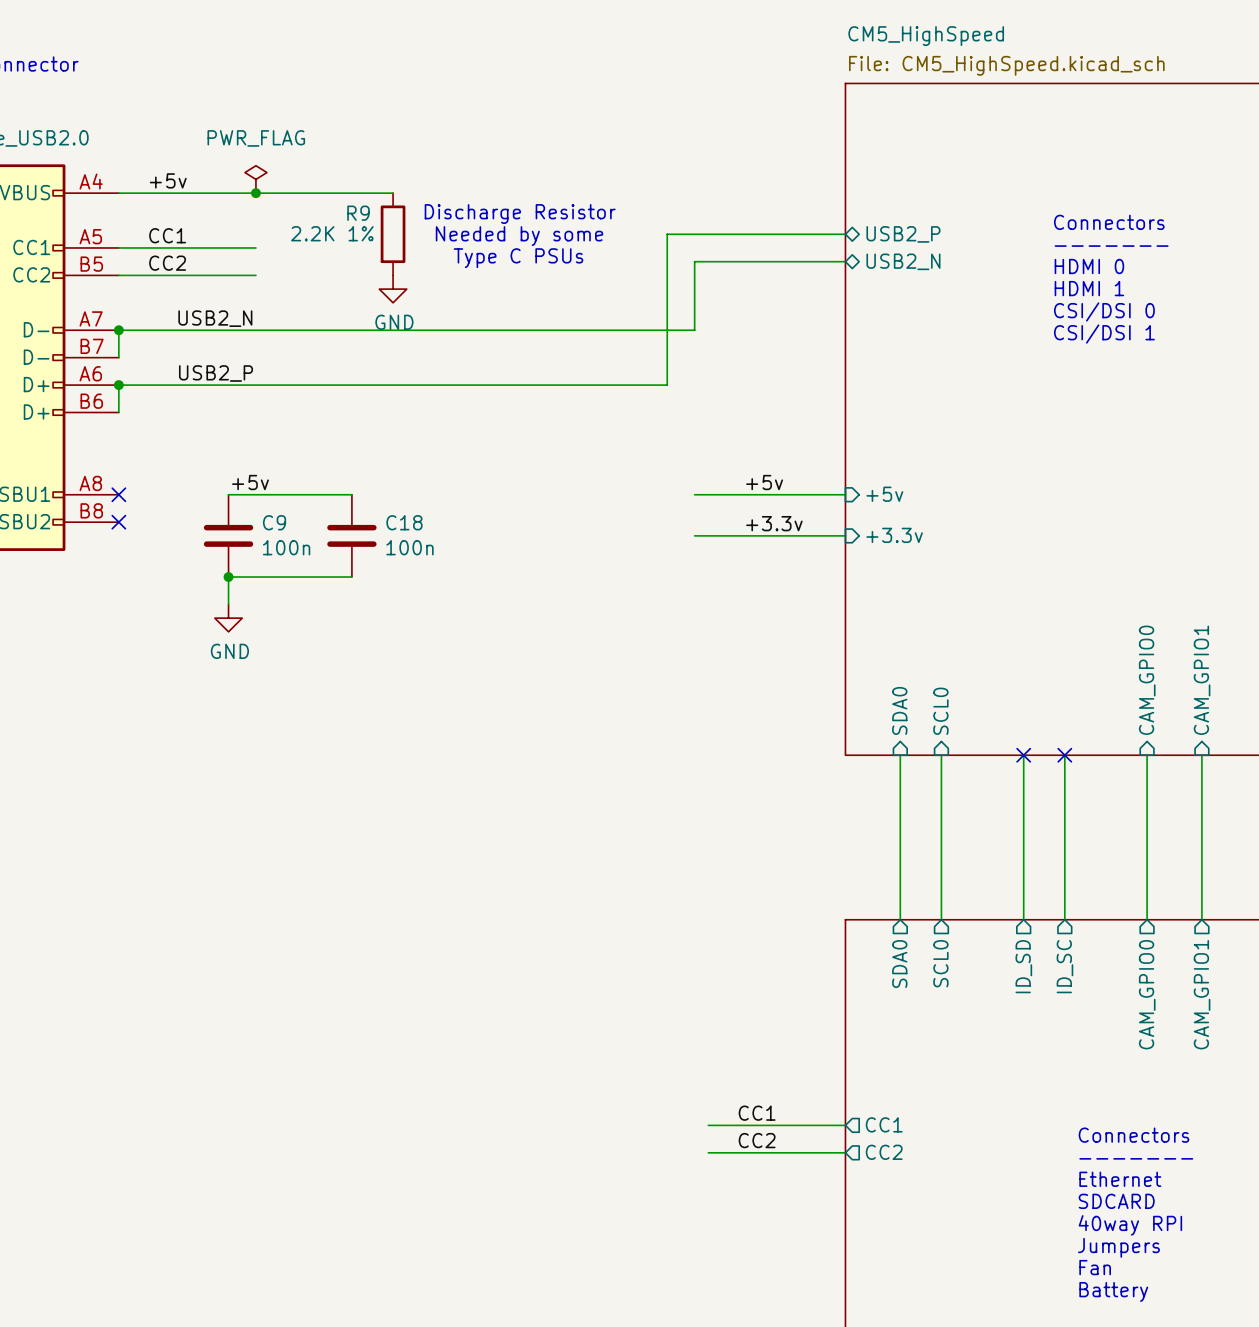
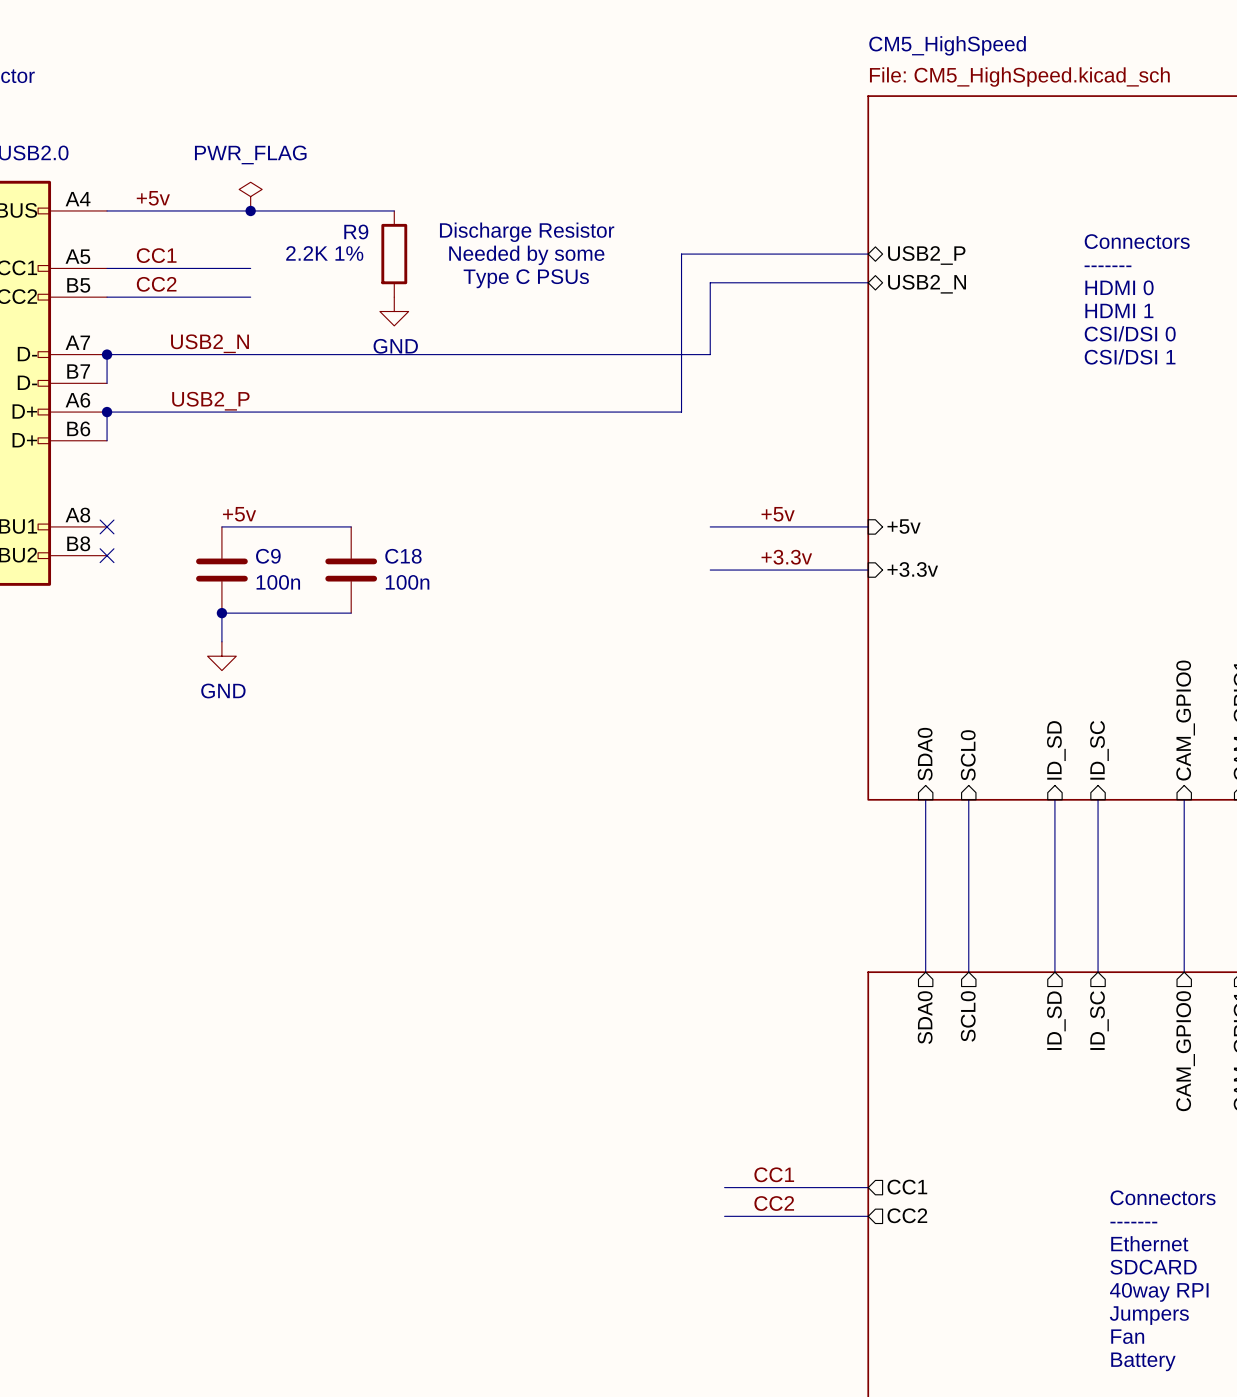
sheet pin: none -> ID_SD (1056, 750)
sheet pin: none -> ID_SC (1099, 750)
no-connect mark: (1023, 755) -> none
no-connect mark: (1064, 755) -> none

